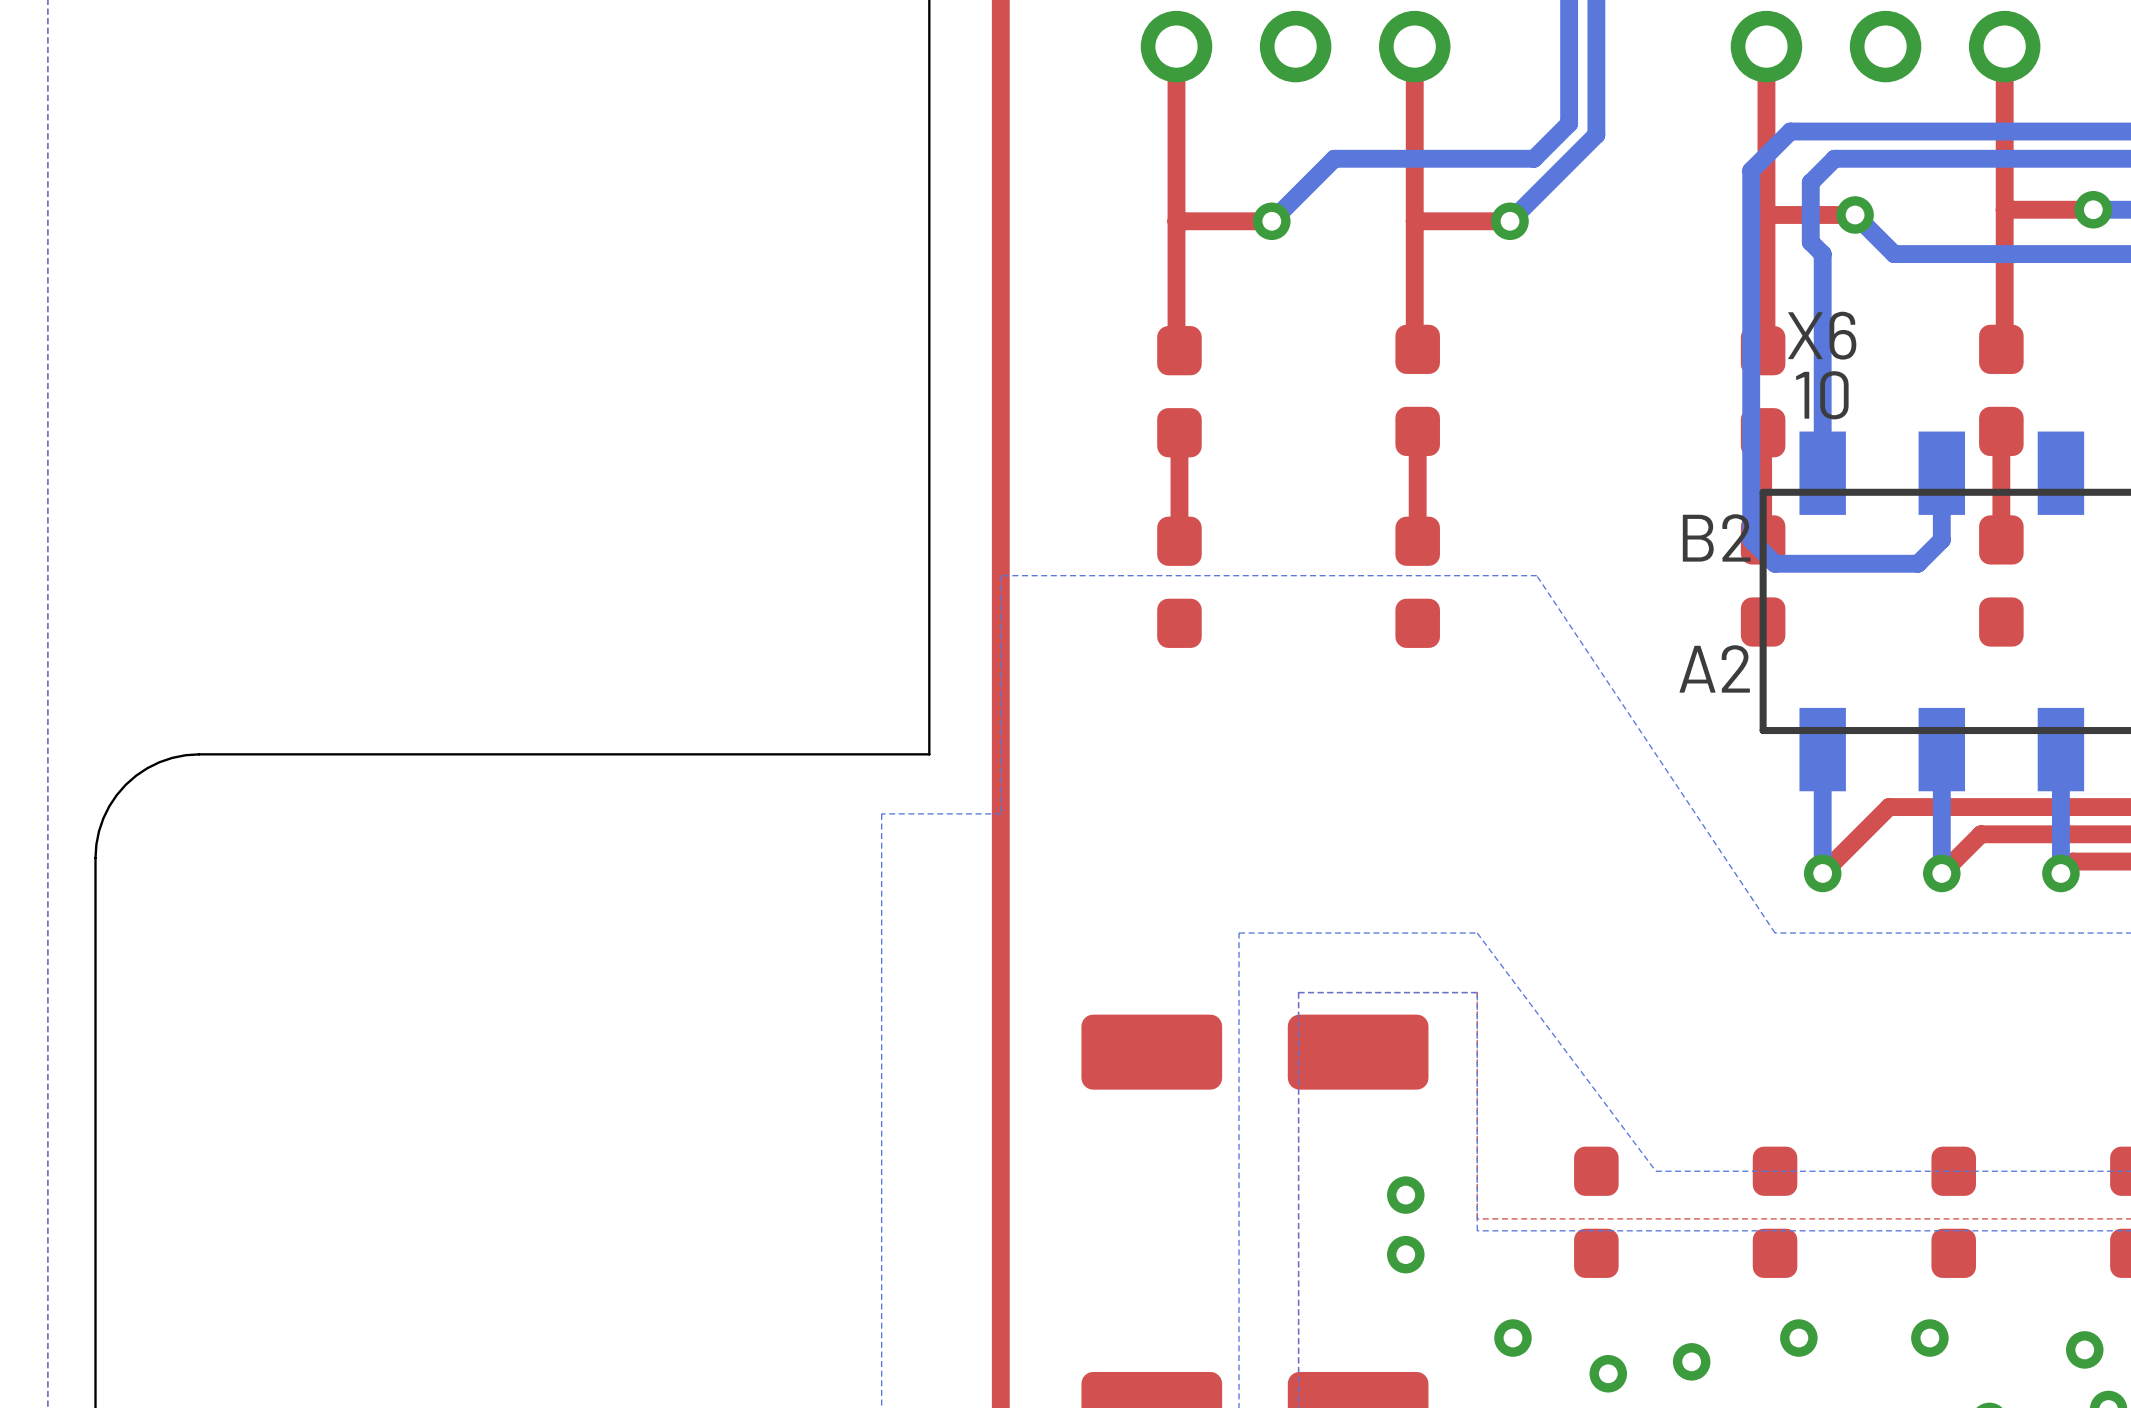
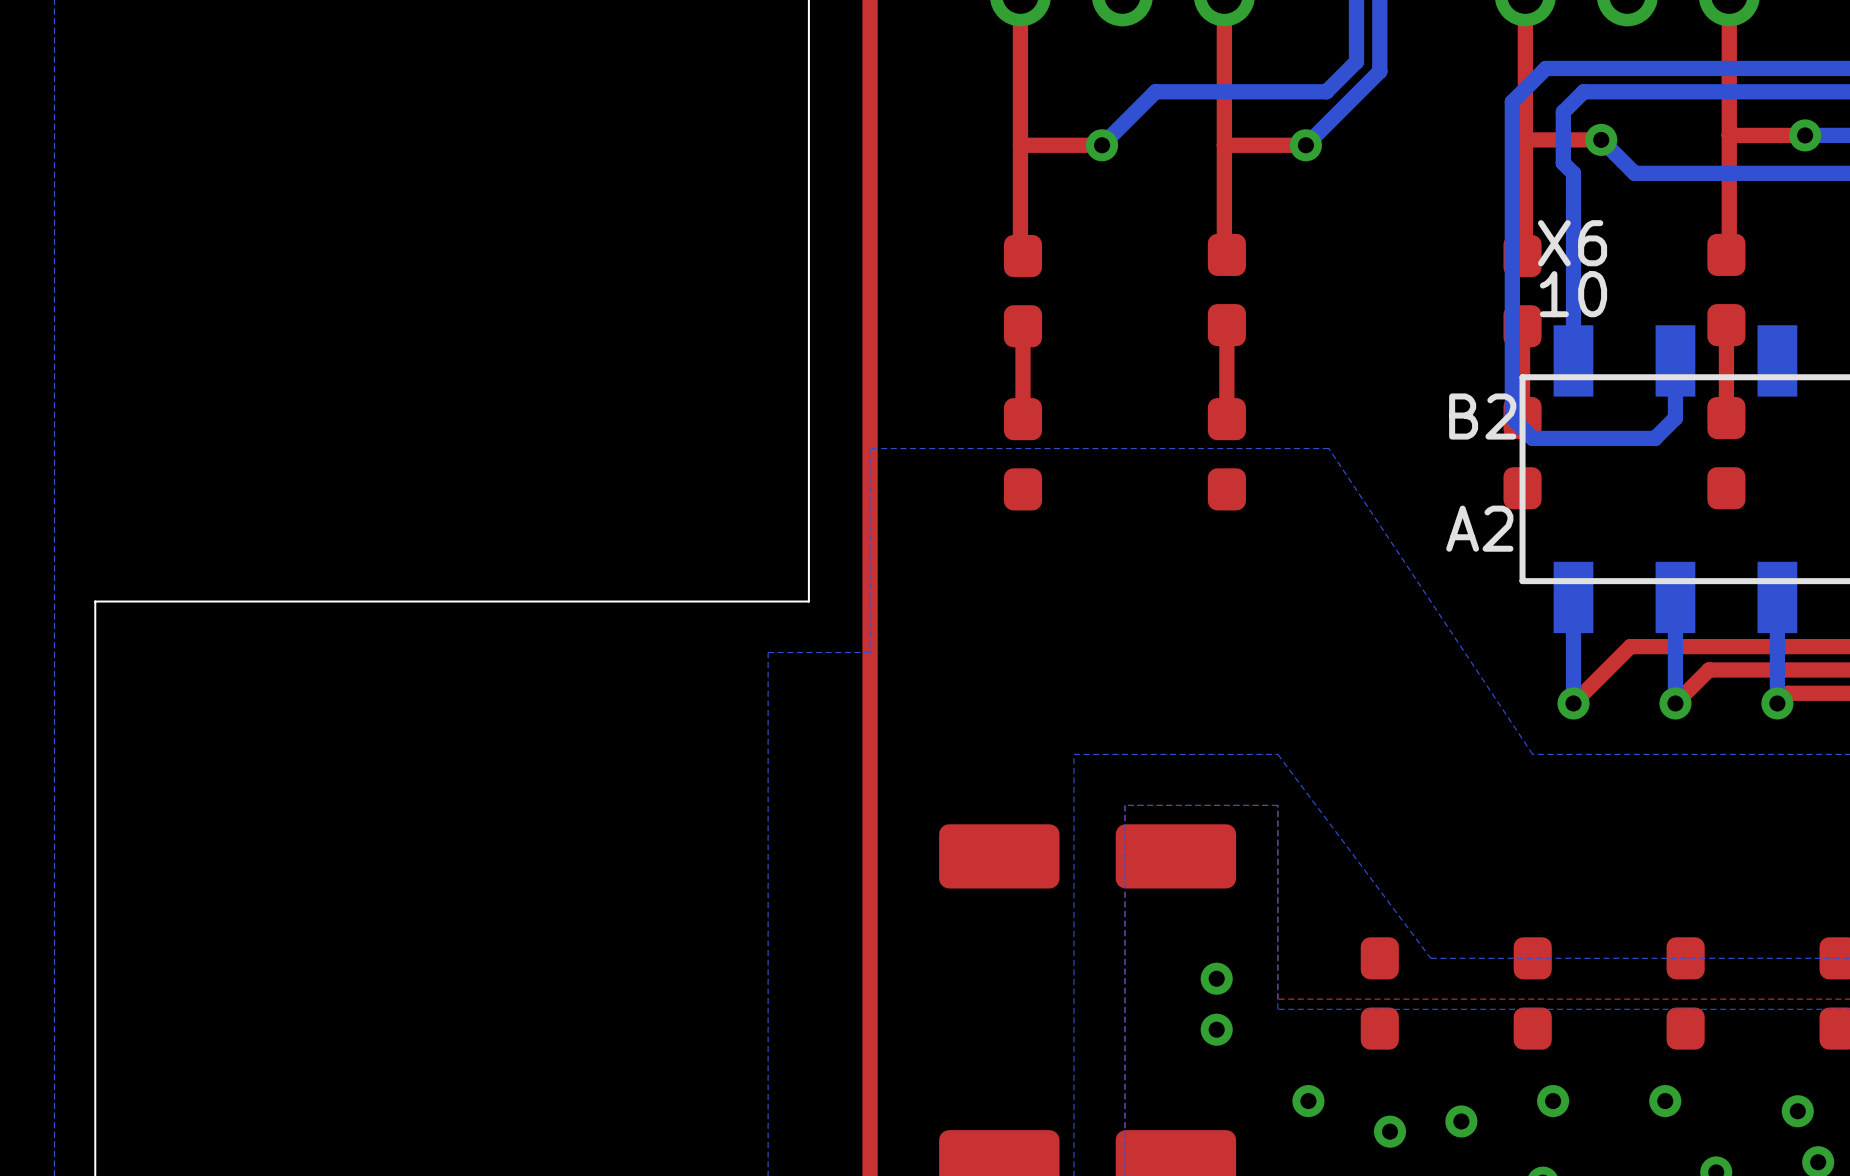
board edge: (199, 754) (172, 757) (159, 762) (136, 775) (125, 784) (116, 794) (103, 818) (99, 831) (95, 857) -> (183, 601) (95, 601) (95, 690)

